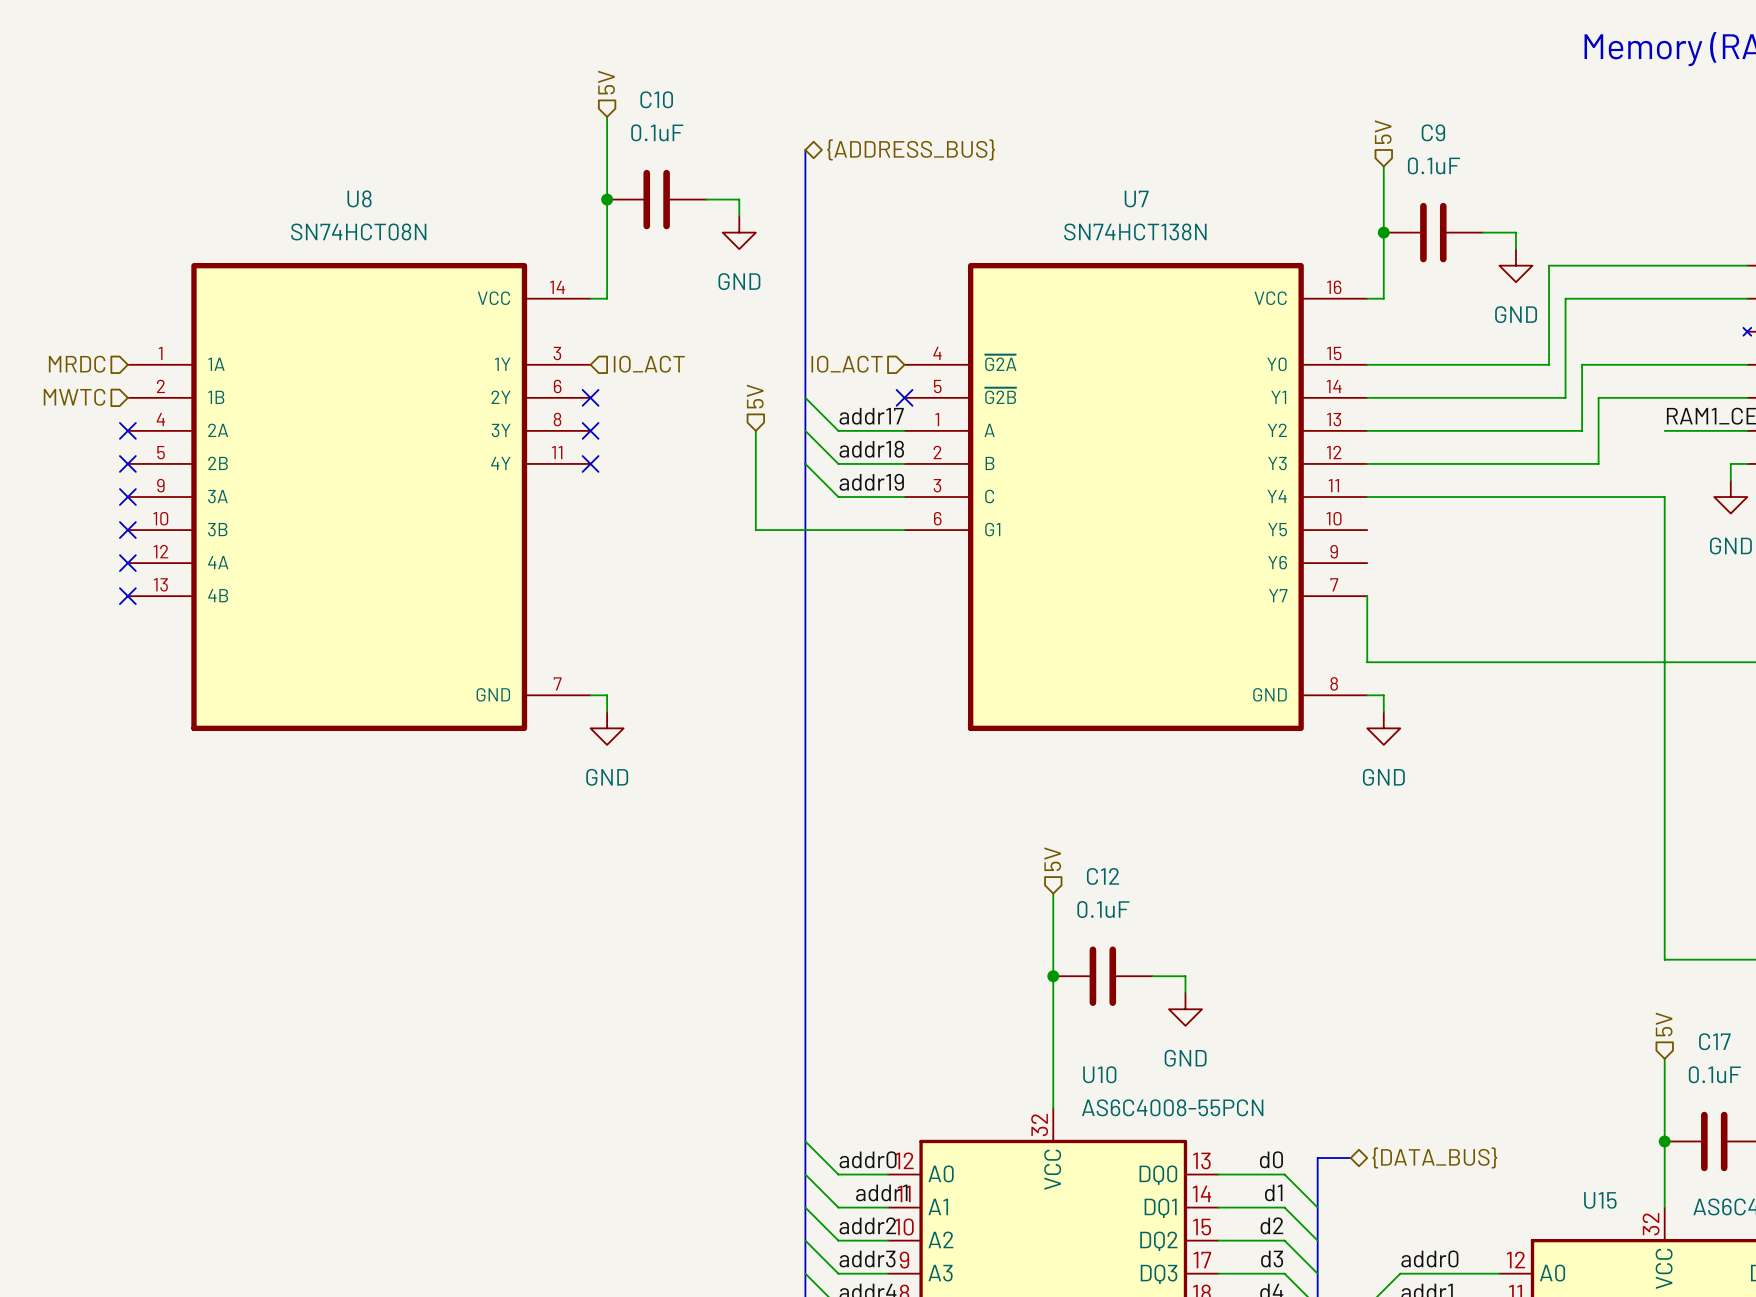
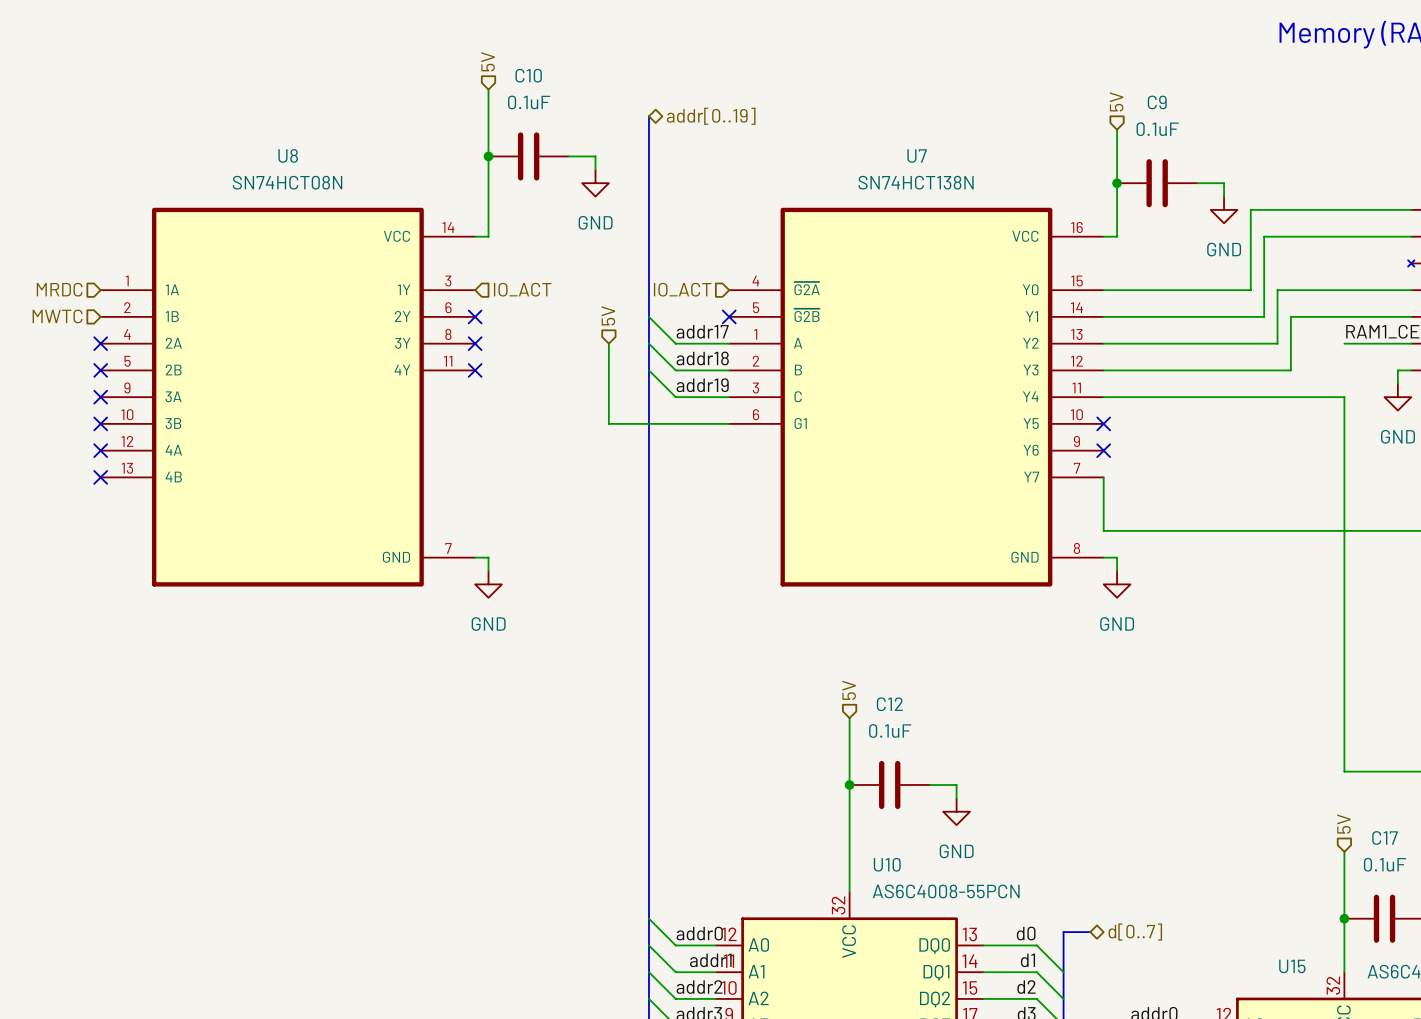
hierarchical label: {ADDRESS_BUS} (911, 149) -> addr[0..19] (711, 116)
no-connect mark: none -> (1103, 423)
no-connect mark: none -> (1103, 450)
hierarchical label: {DATA_BUS} (1434, 1157) -> d[0..7] (1135, 932)

